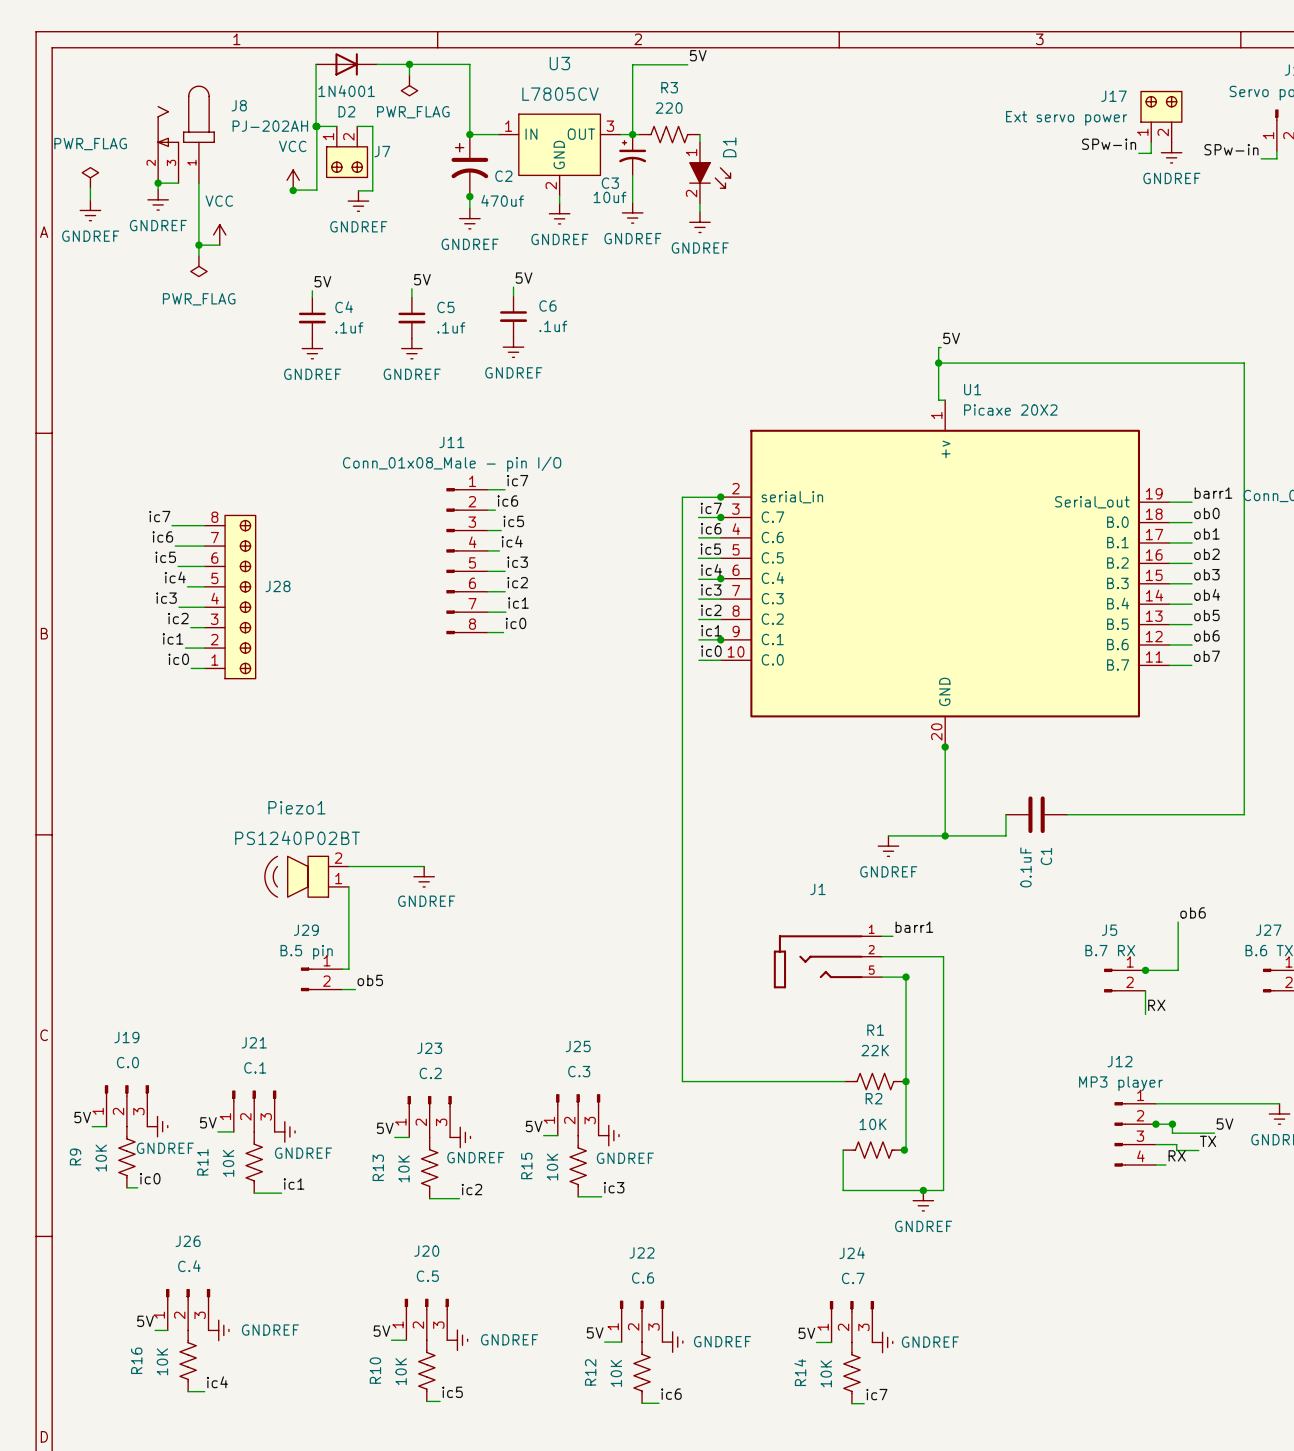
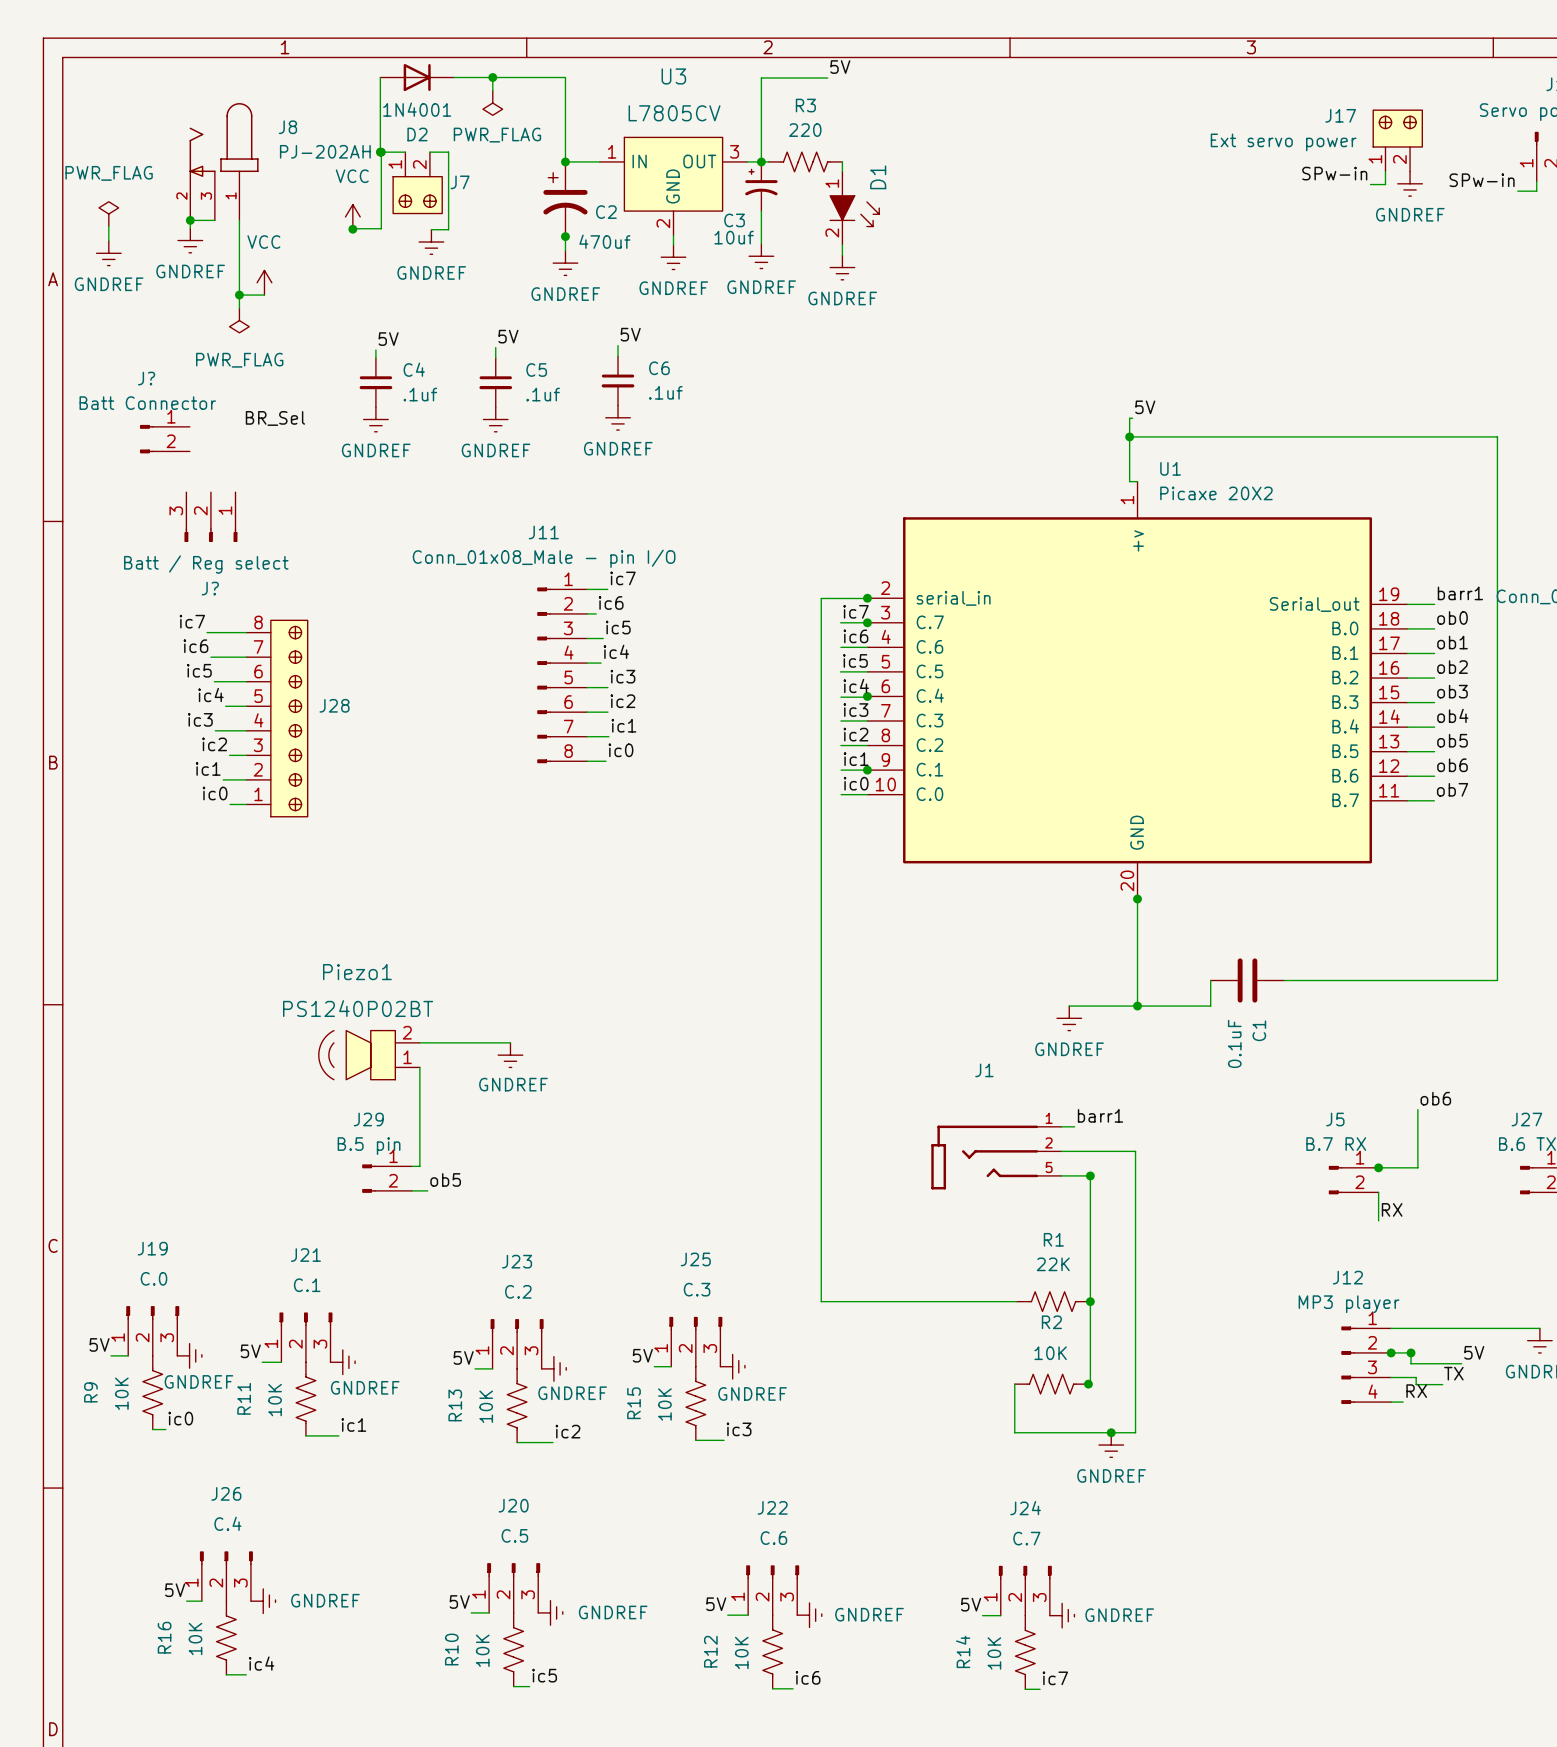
label: none -> BR_Sel (275, 418)
J?: none -> Batt Connector (164, 439)
J?: none -> Batt / Reg select (210, 517)

